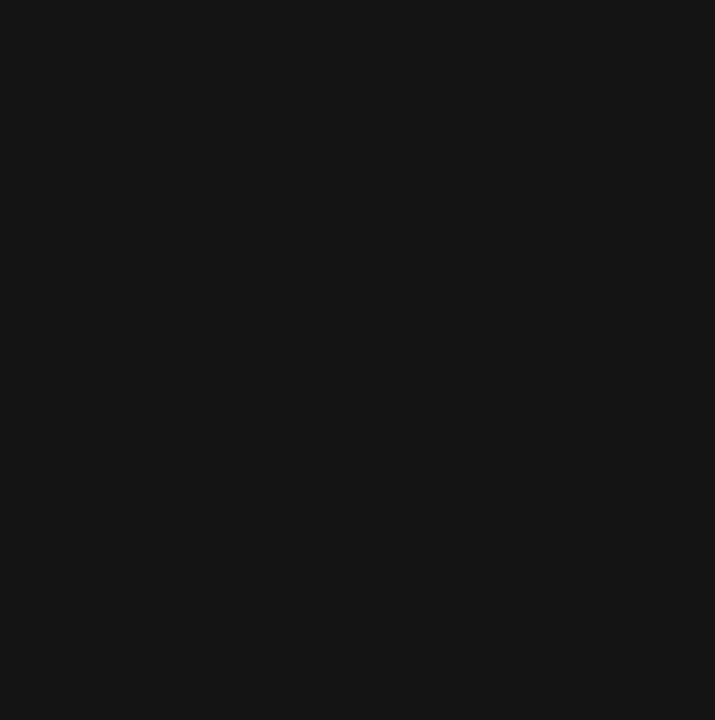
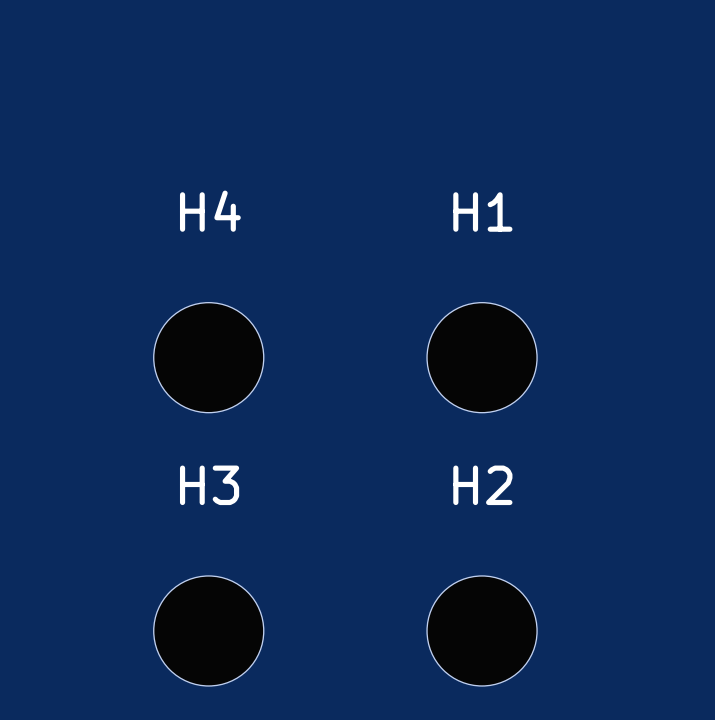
H4: none -> (208, 357)
H1: none -> (482, 357)
H3: none -> (208, 630)
H2: none -> (482, 630)

